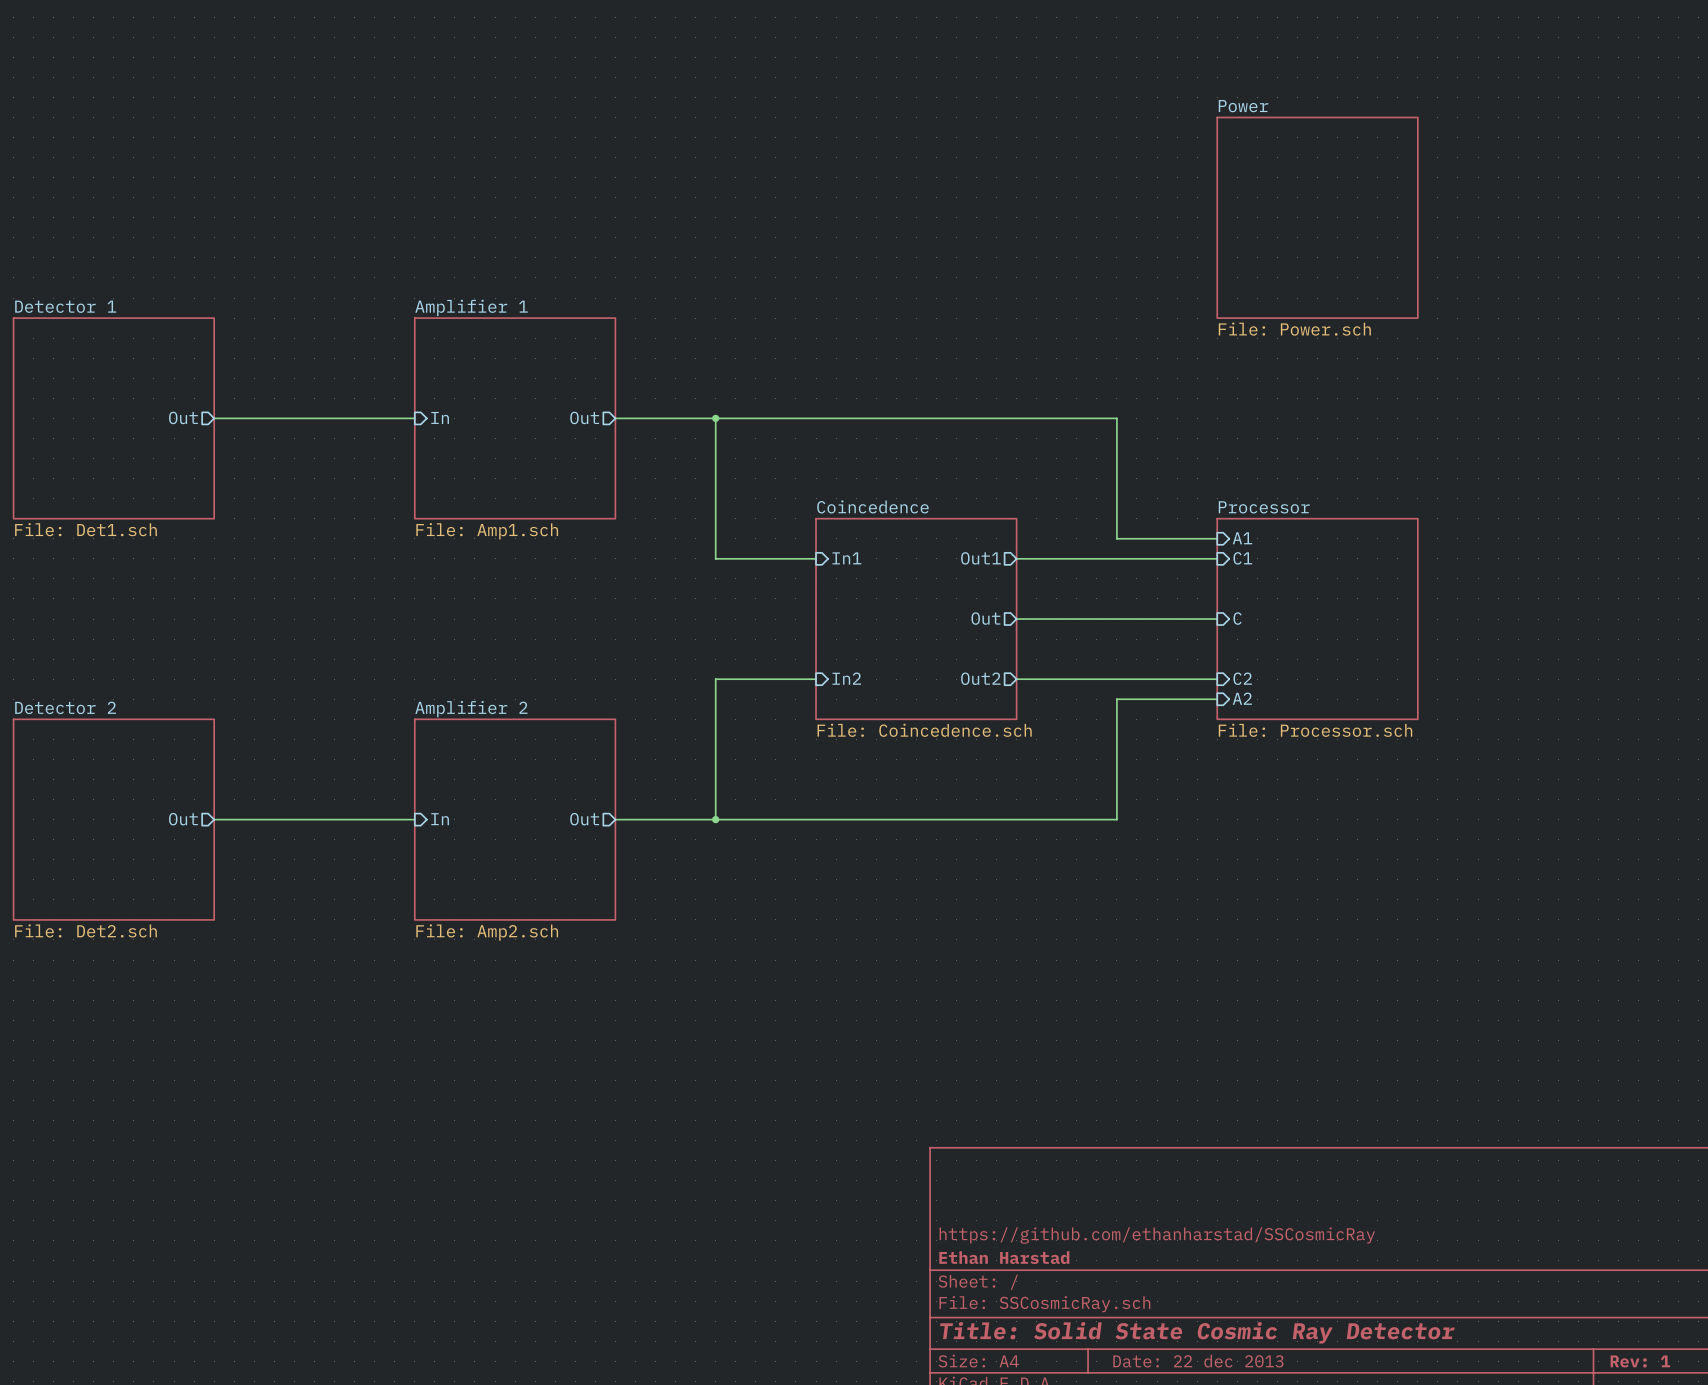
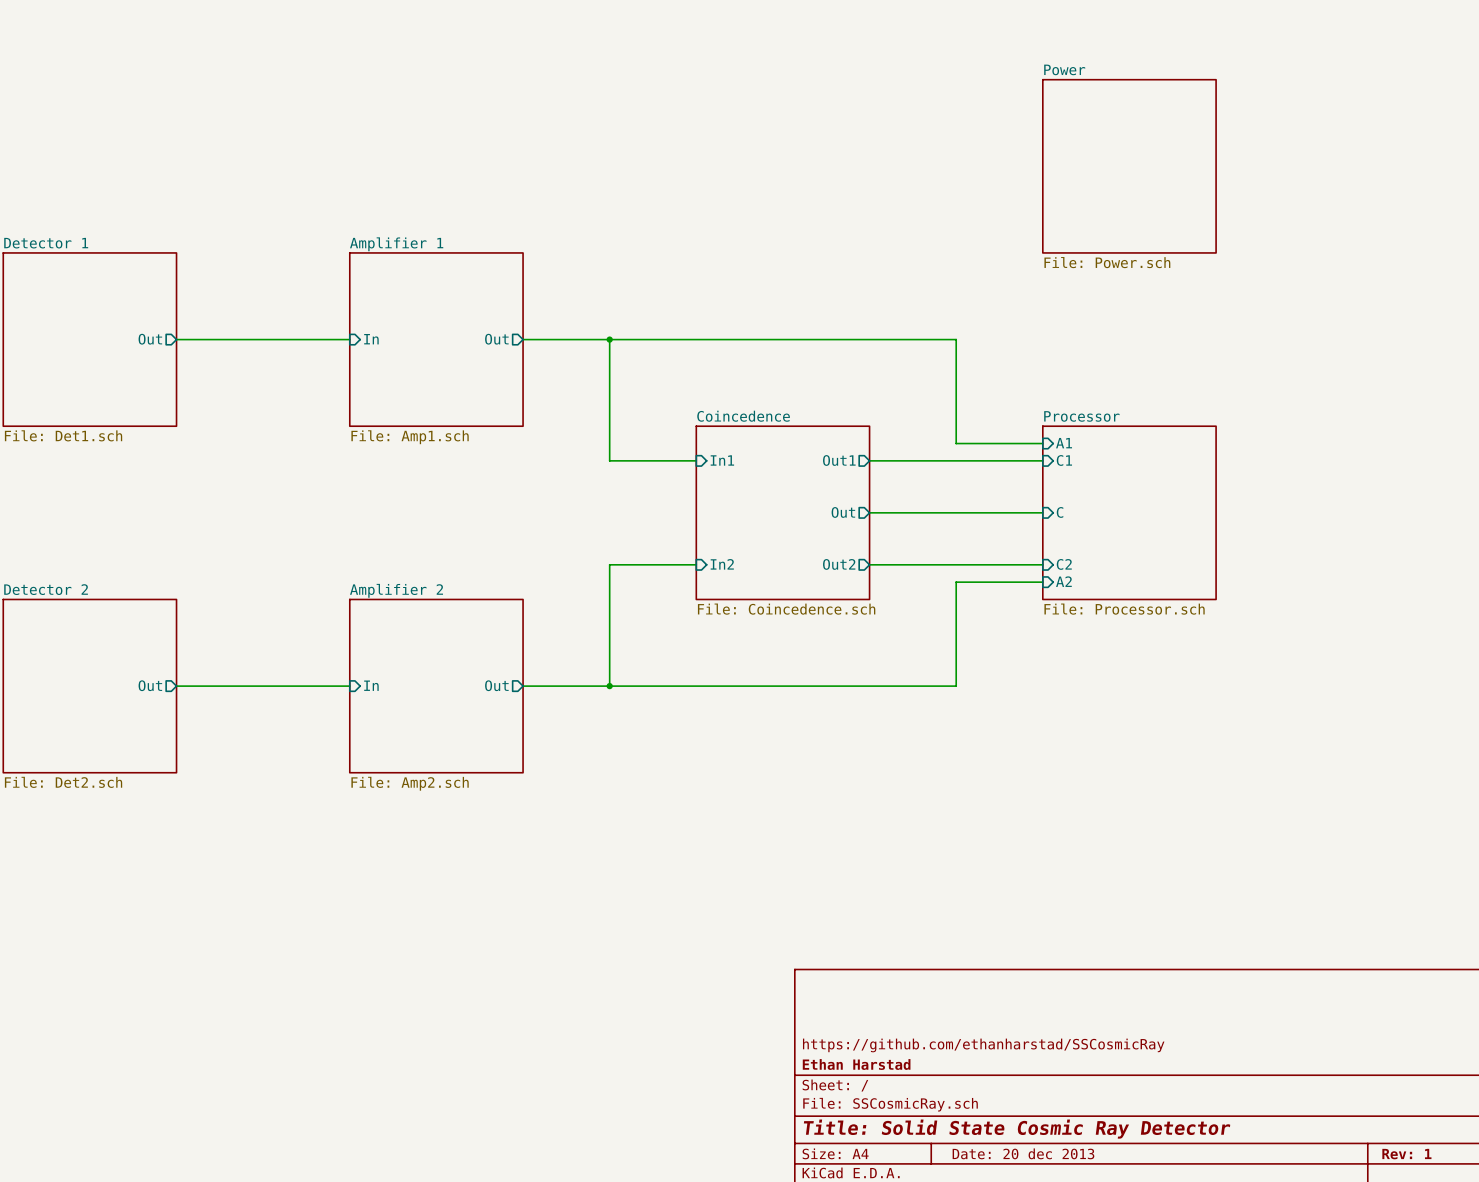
title block: Date: 22 dec 2013 (1198, 1361) -> Date: 20 dec 2013 (1023, 1153)

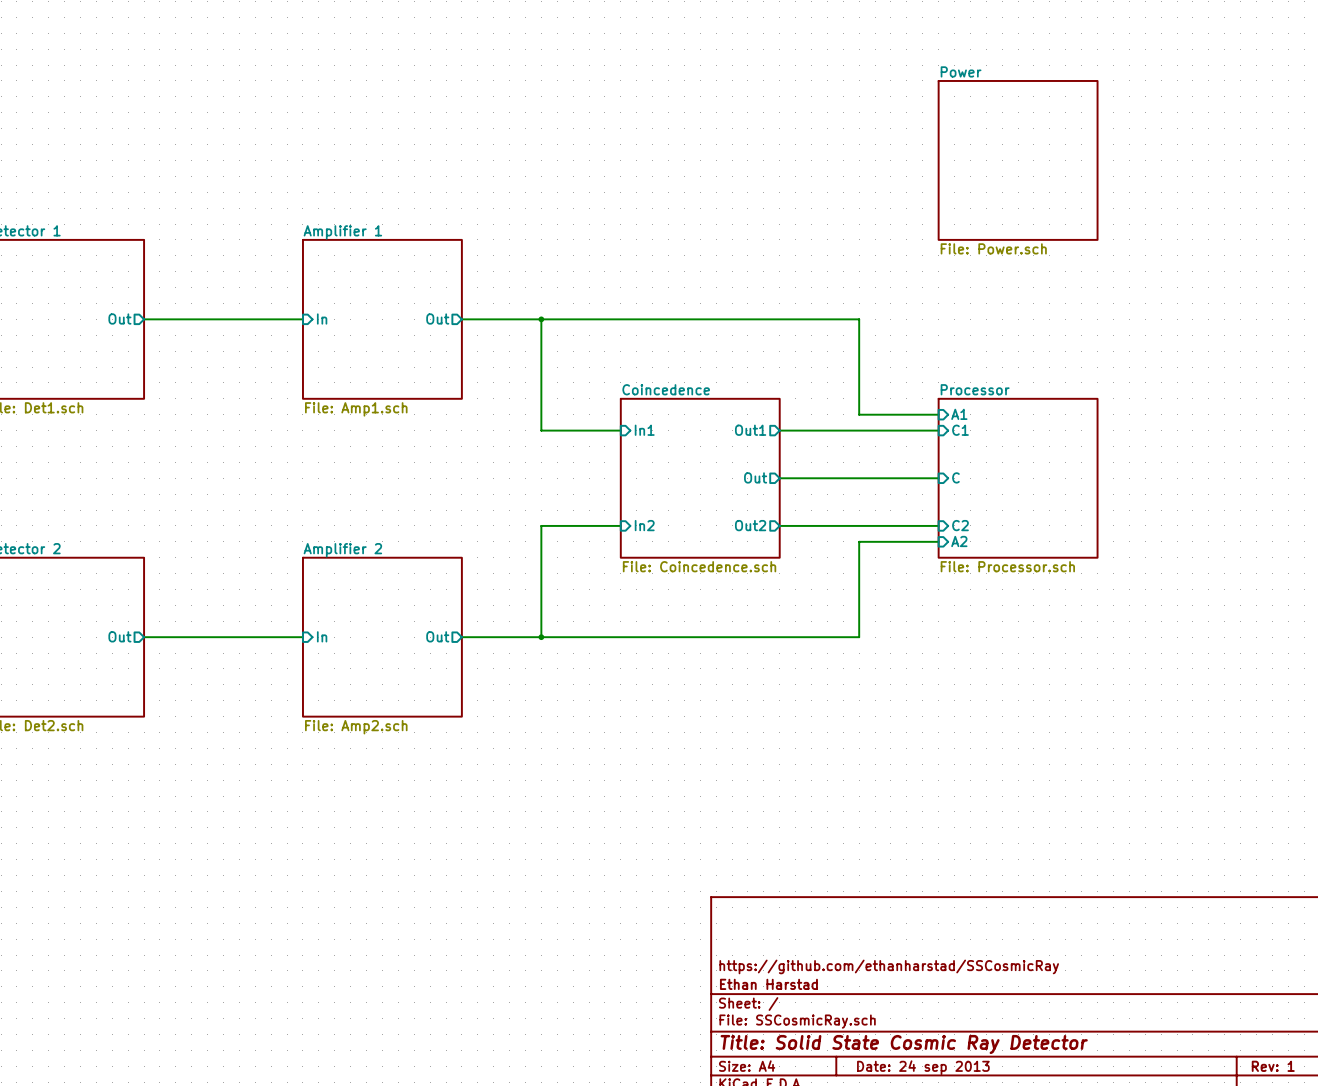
title block: Date: 20 dec 2013 (1023, 1153) -> Date: 24 sep 2013 (923, 1067)

